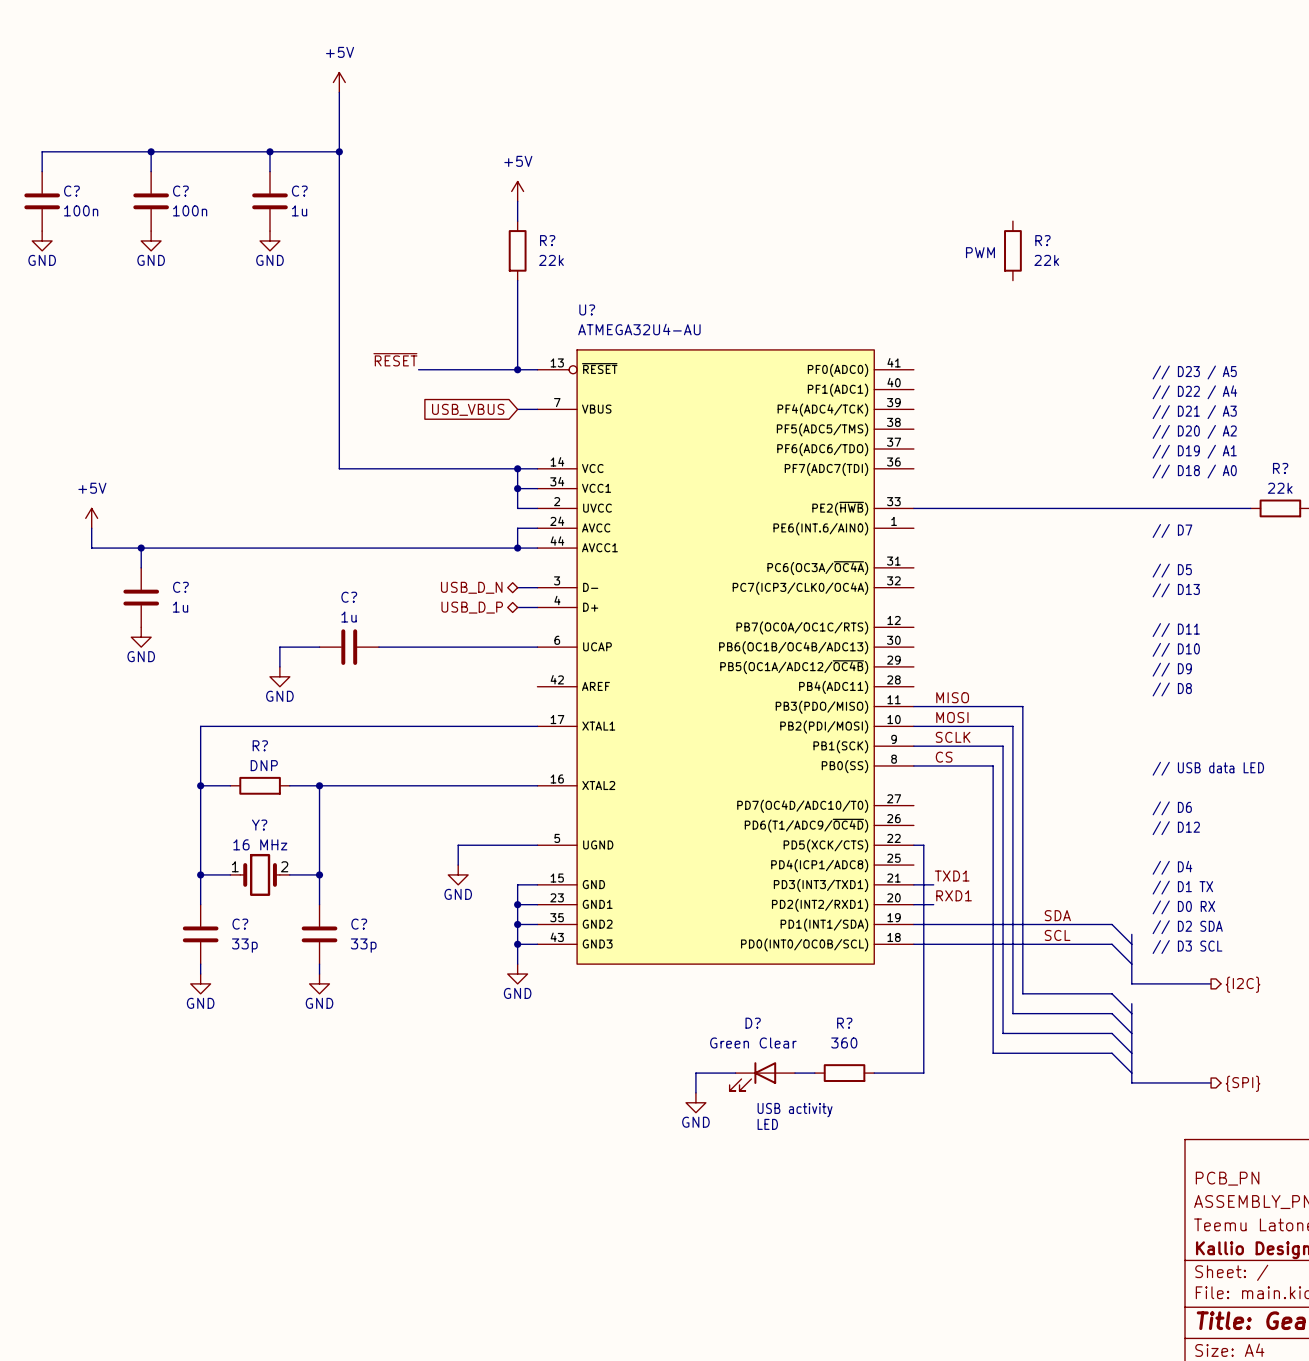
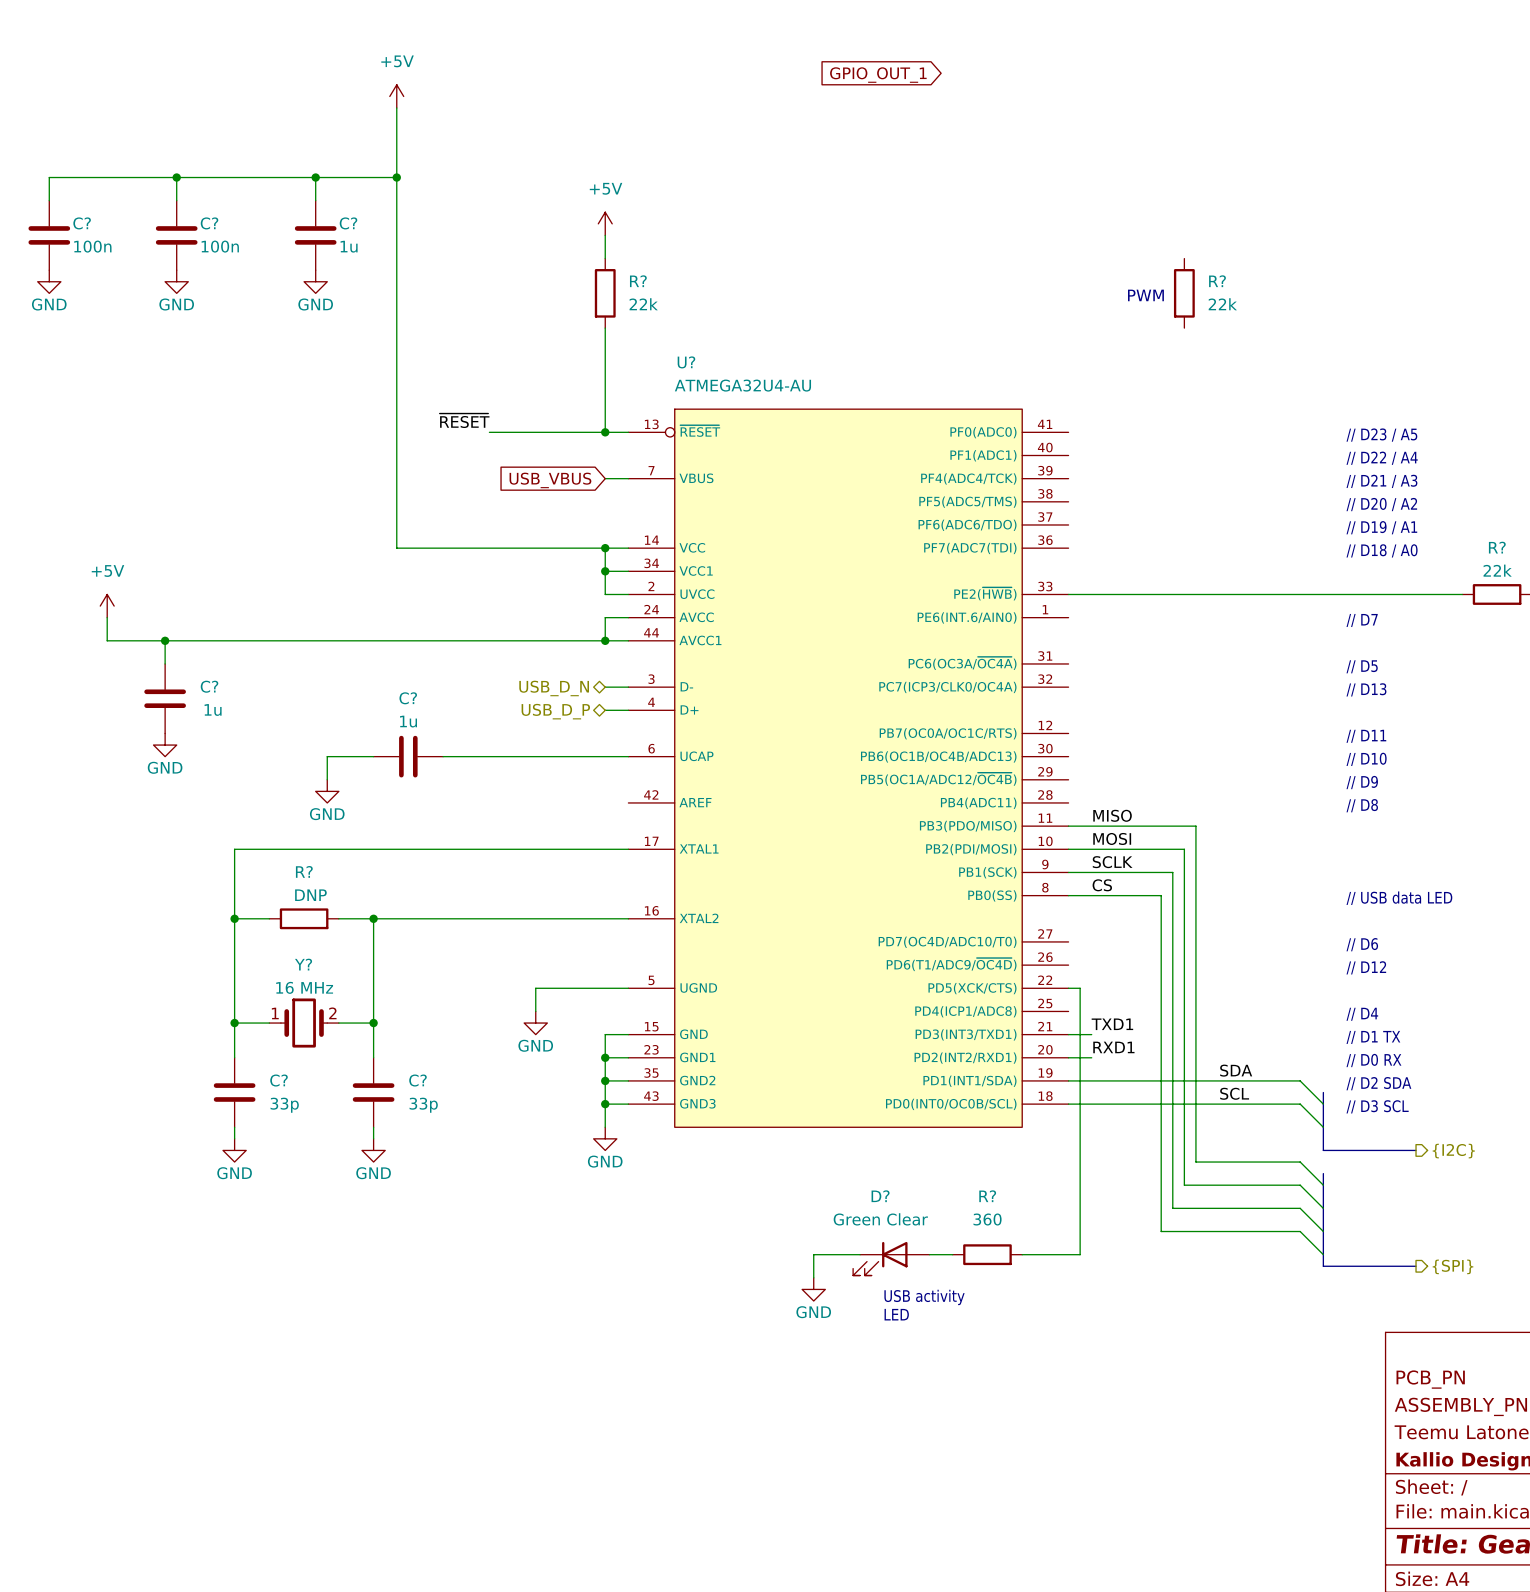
global label: none -> GPIO_OUT_1 (878, 75)

